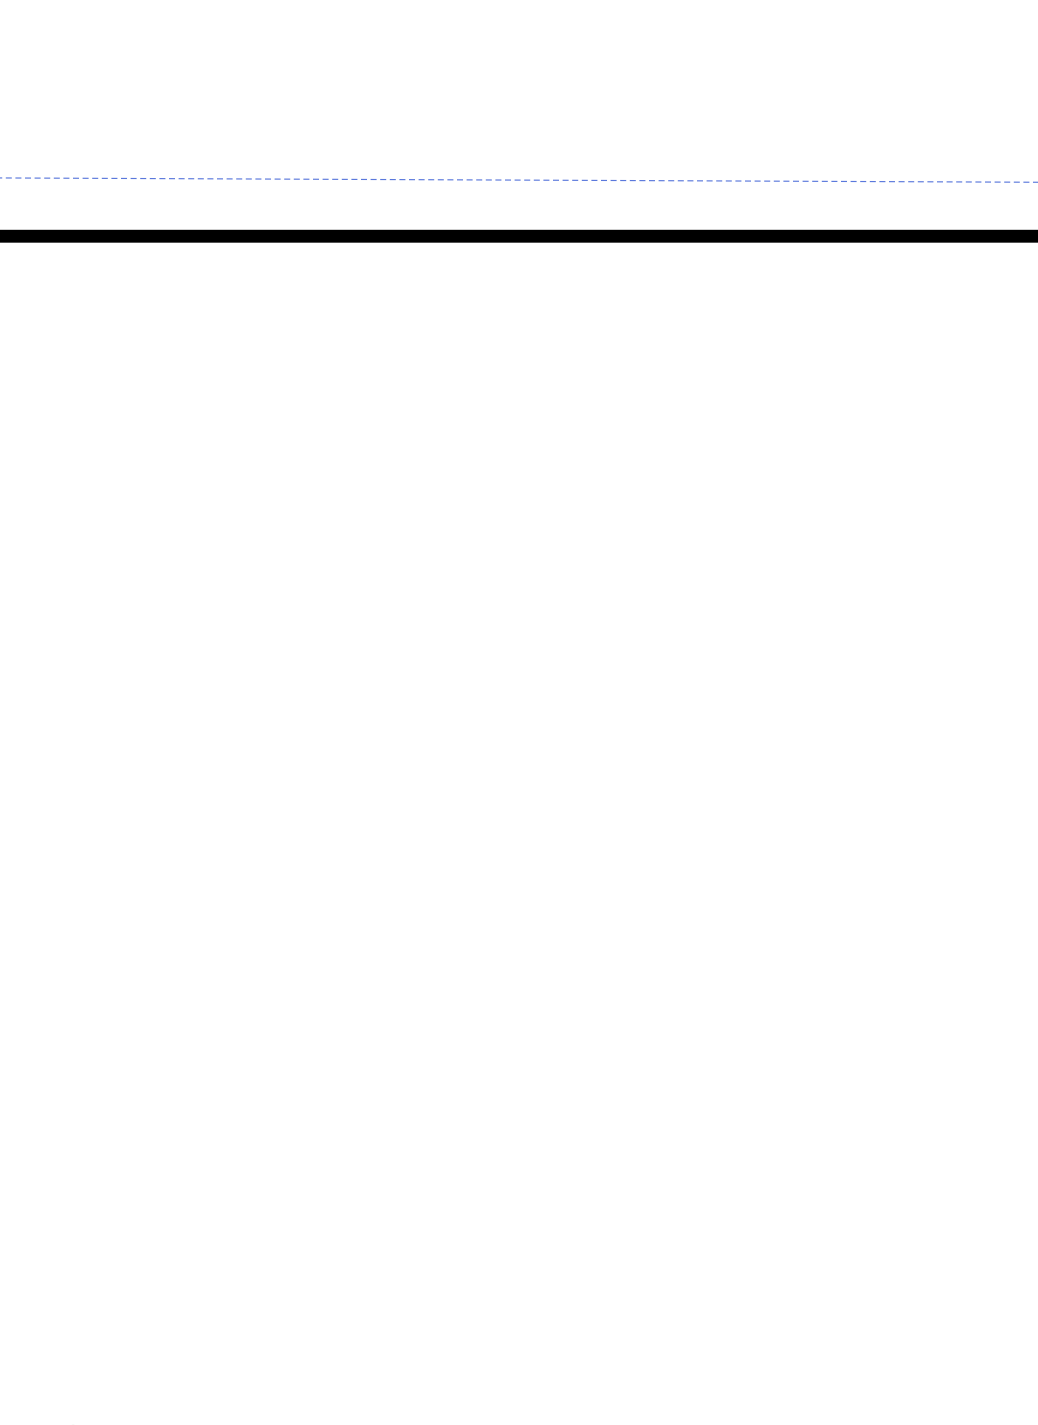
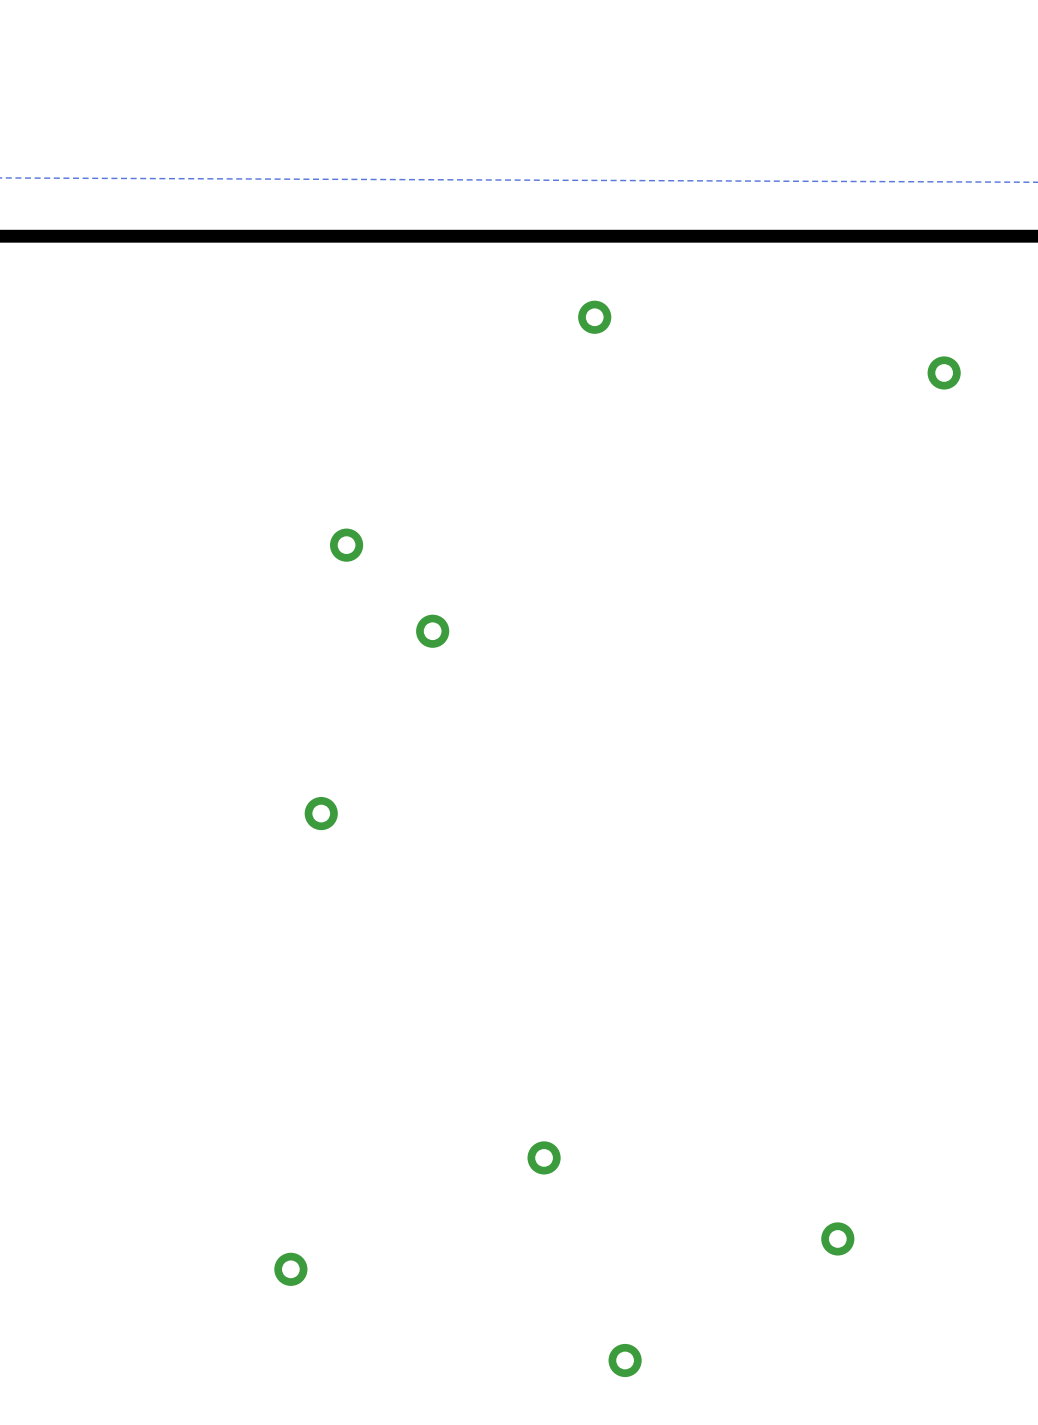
via: none -> (594, 317)
via: none -> (944, 372)
via: none -> (346, 545)
via: none -> (432, 631)
via: none -> (321, 813)
via: none -> (544, 1157)
via: none -> (837, 1238)
via: none -> (290, 1269)
via: none -> (625, 1360)

